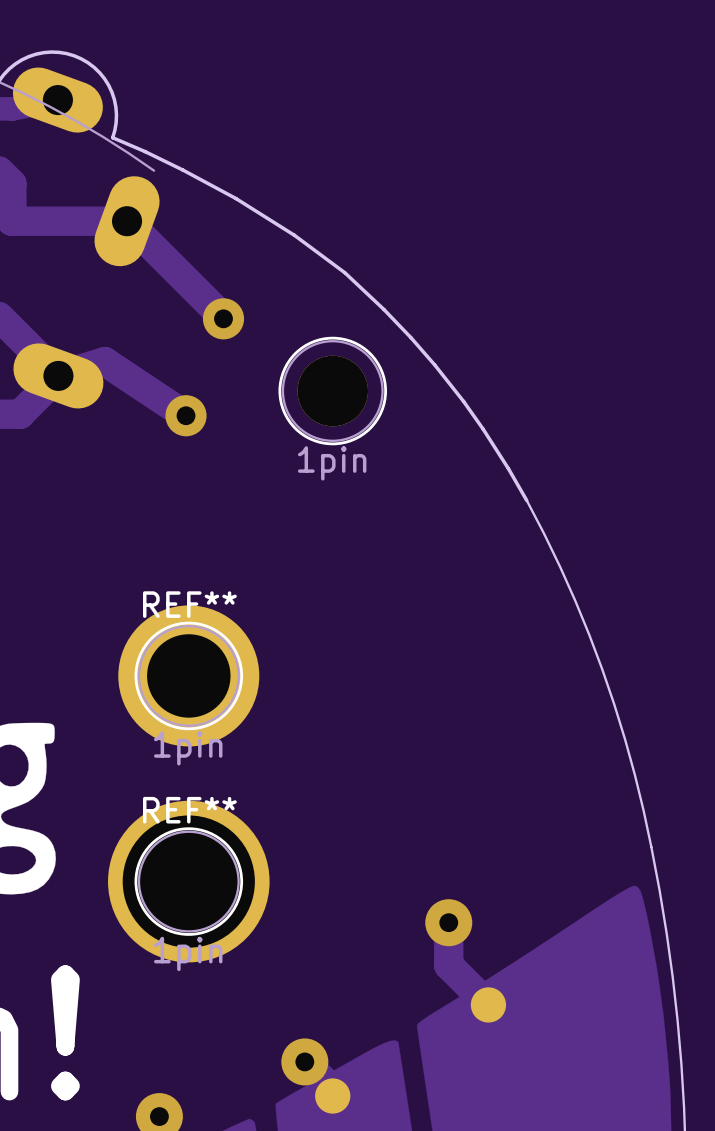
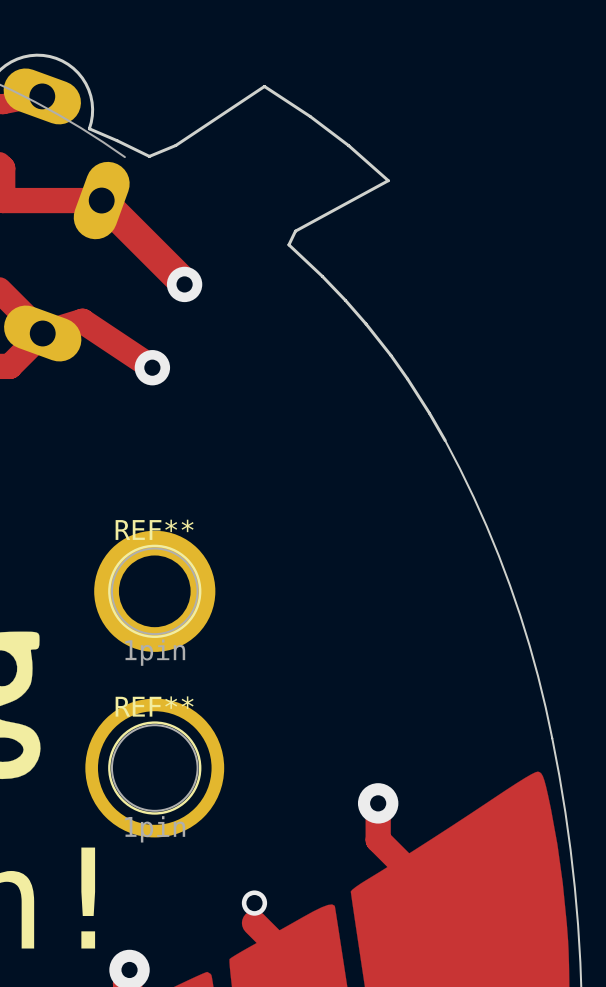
board edge: (182, 169) (235, 198) (294, 235) (344, 272) -> (149, 156) (175, 145) (264, 86) (310, 116) (348, 145) (388, 180) (295, 231) (288, 244)
track width: thin (127, 221) (223, 318) -> thick (101, 200) (184, 284)
part: 1pin (332, 391) -> none
via: none -> (254, 903)
via: (304, 1061) -> none

